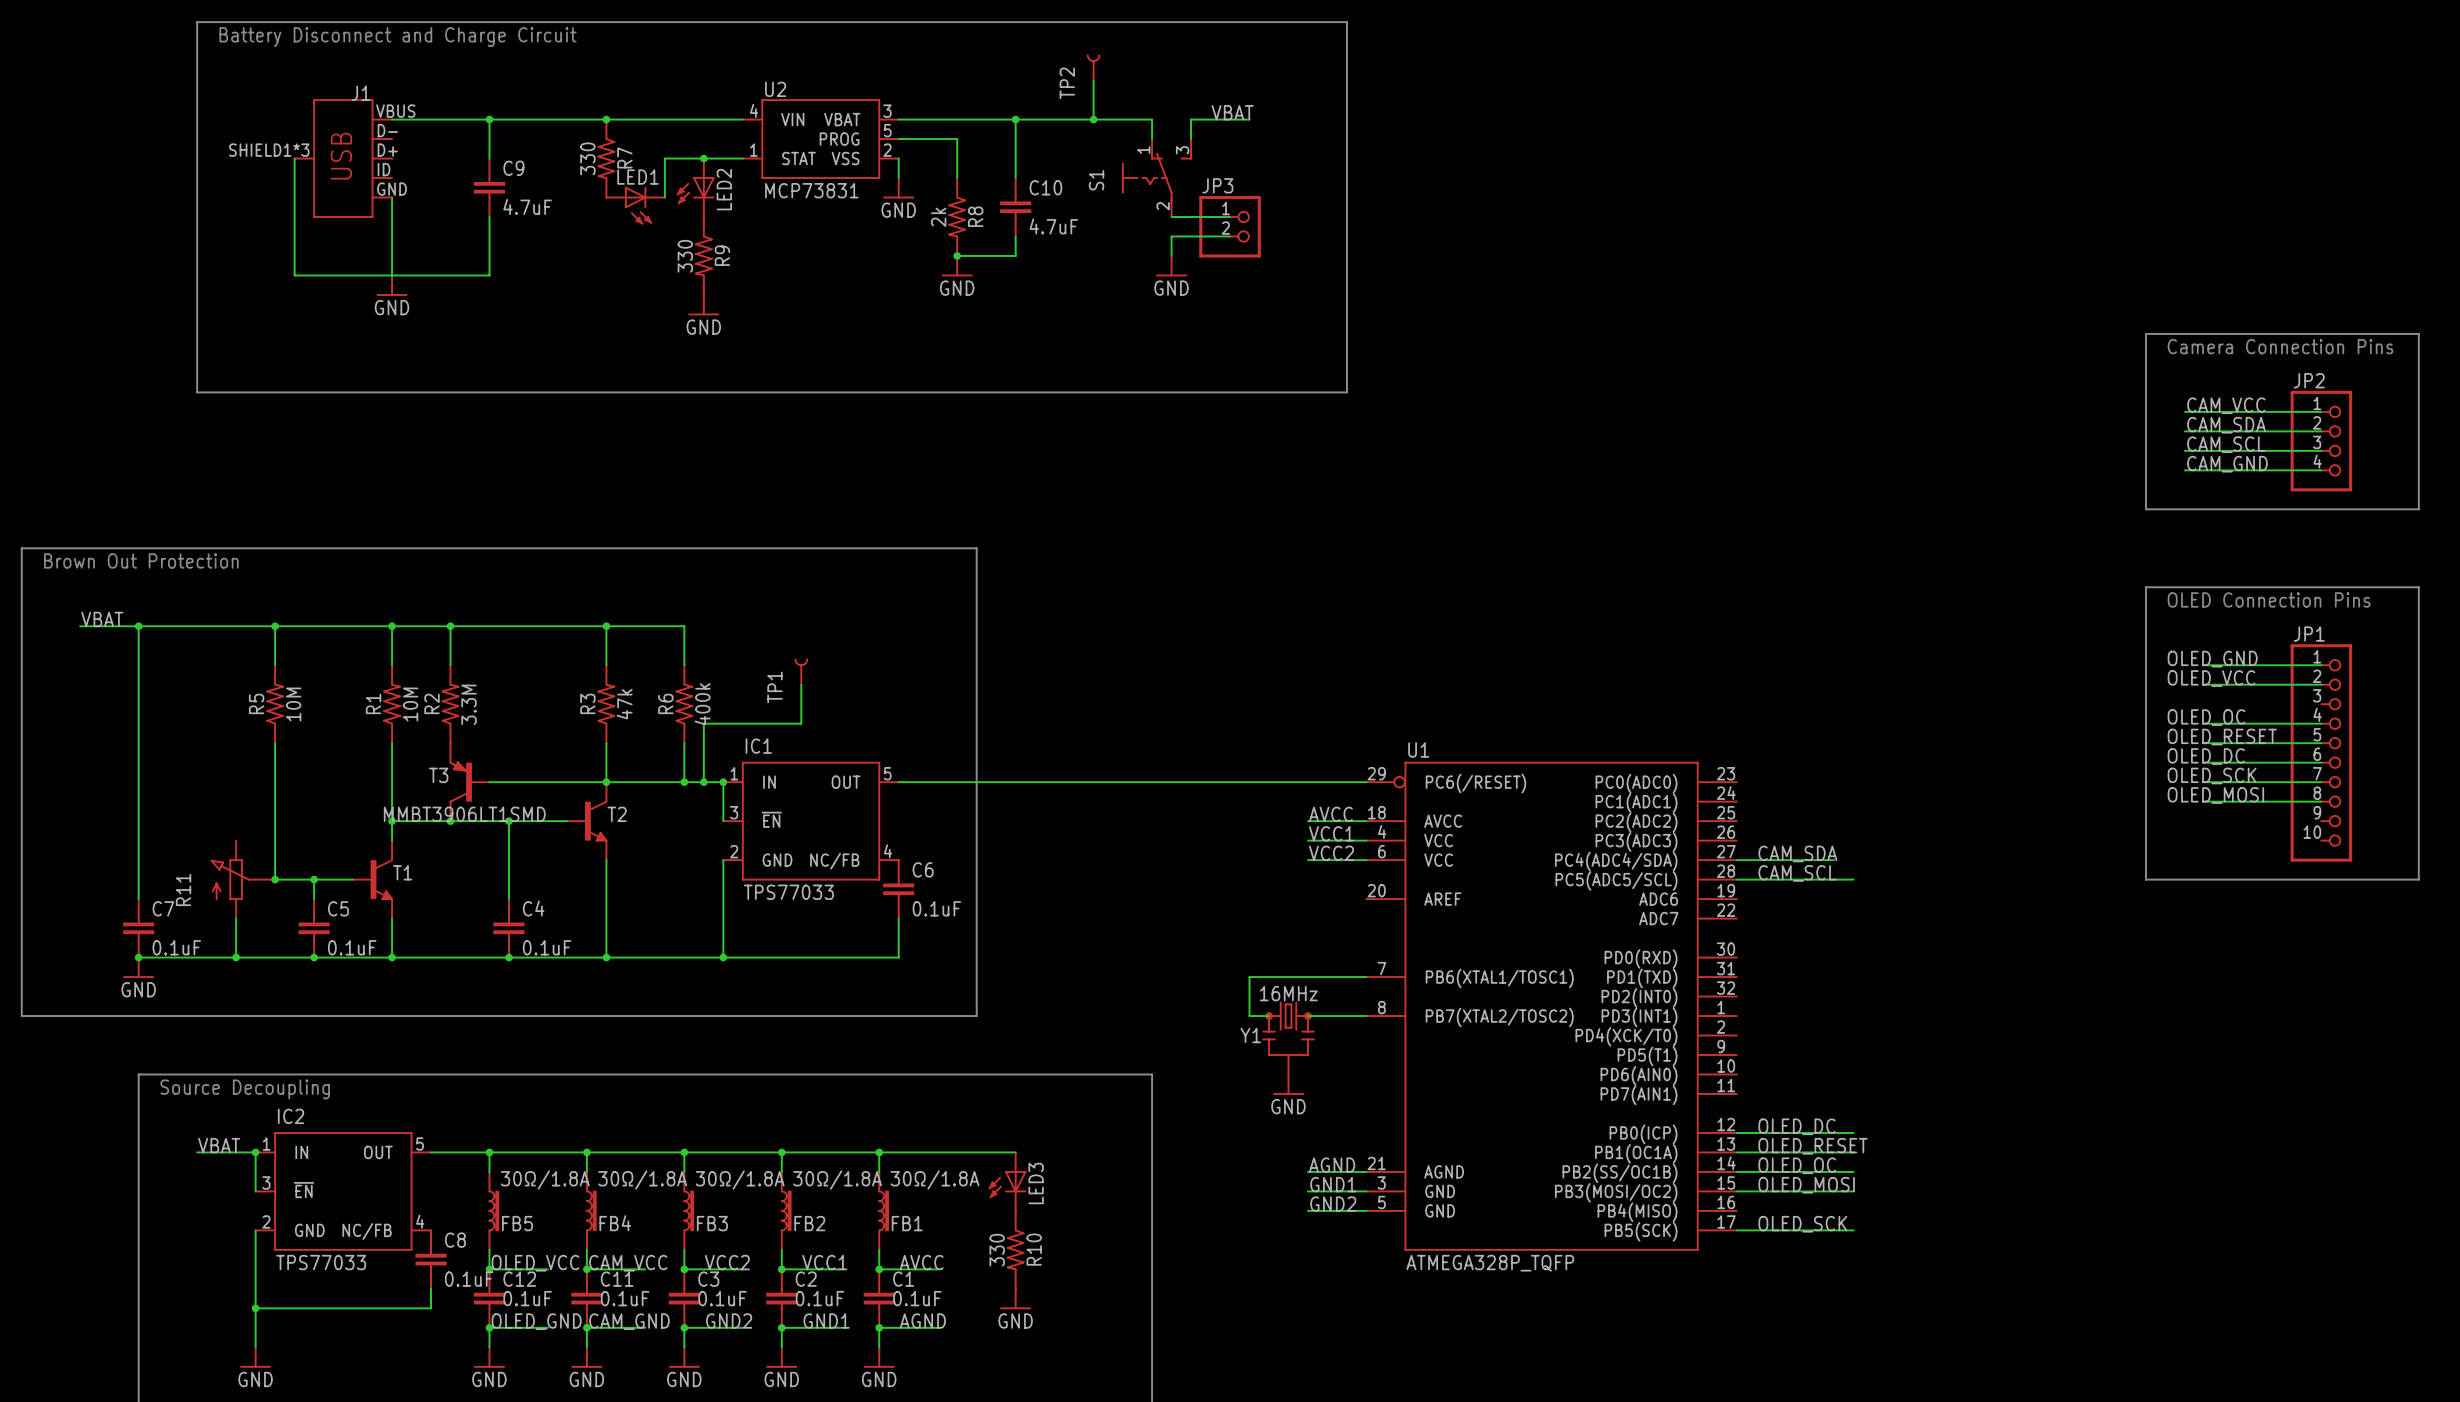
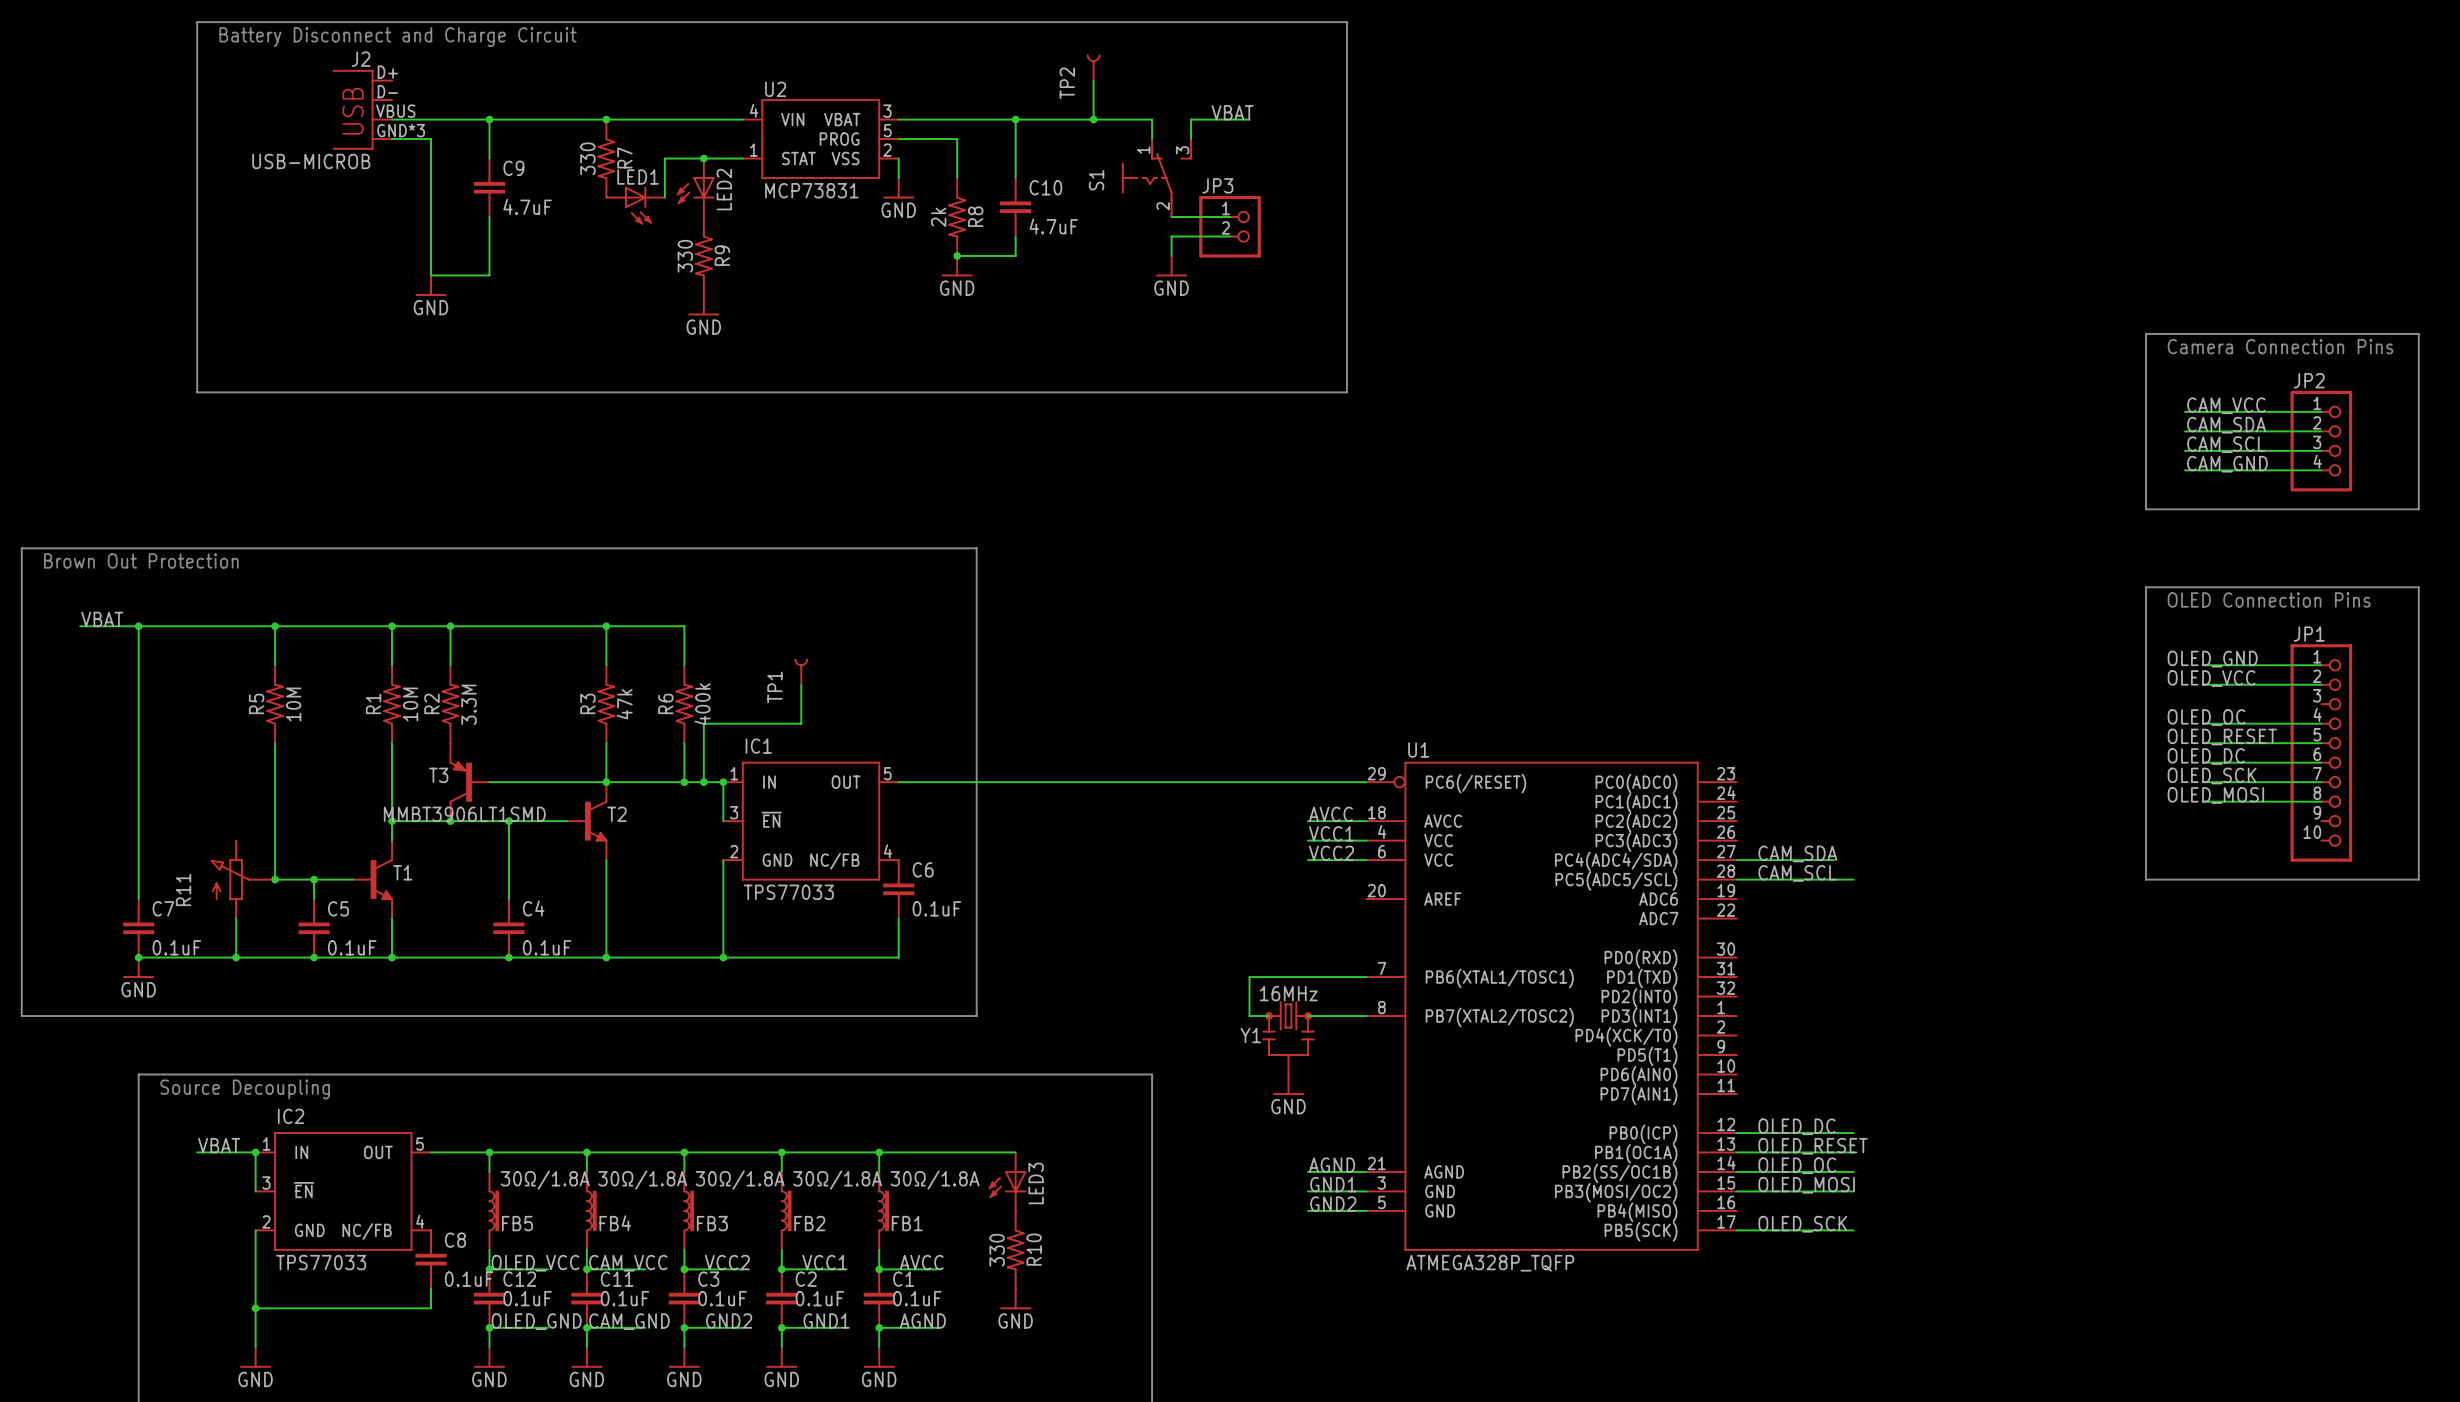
J2: none -> USB-MICROB (362, 109)
wire: (294, 158) (294, 275) (431, 275) -> (392, 139) (431, 139) (431, 275)
J1: (343, 158) -> none
wire: (392, 197) (392, 275) -> none
power symbol position: GND (392, 285) -> GND (431, 285)

